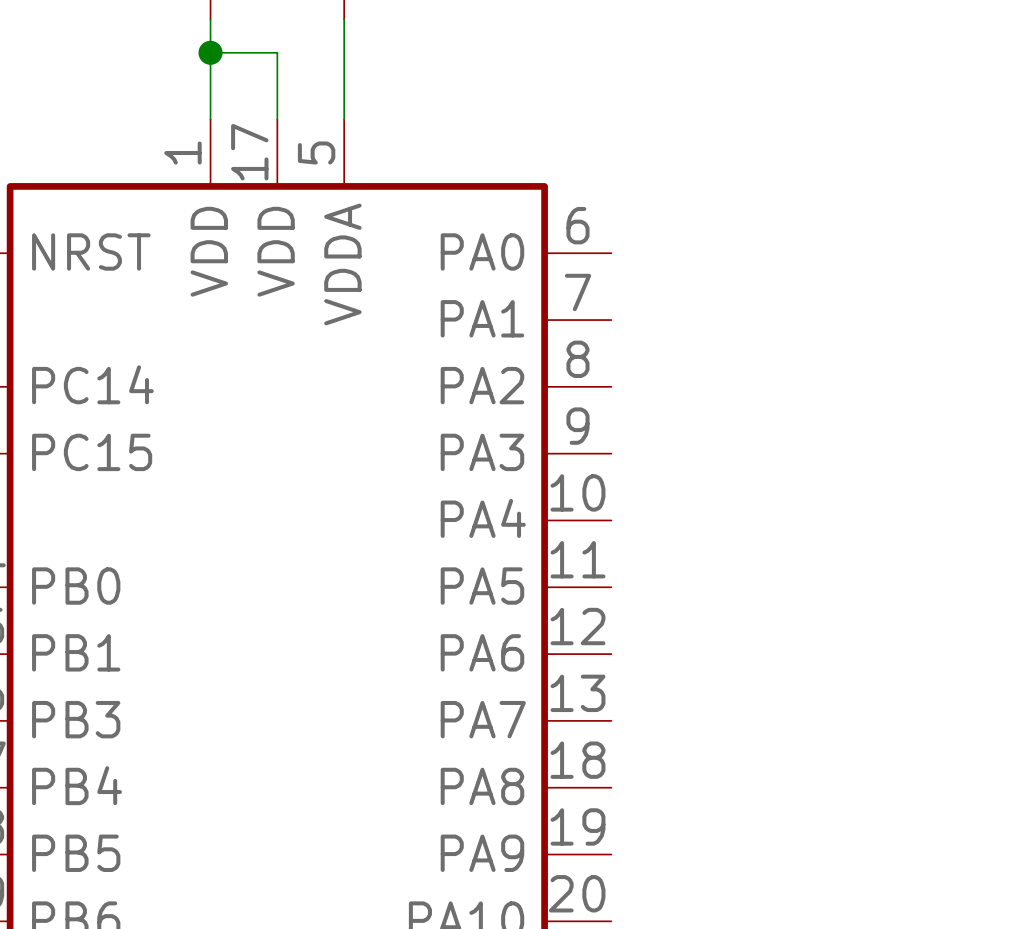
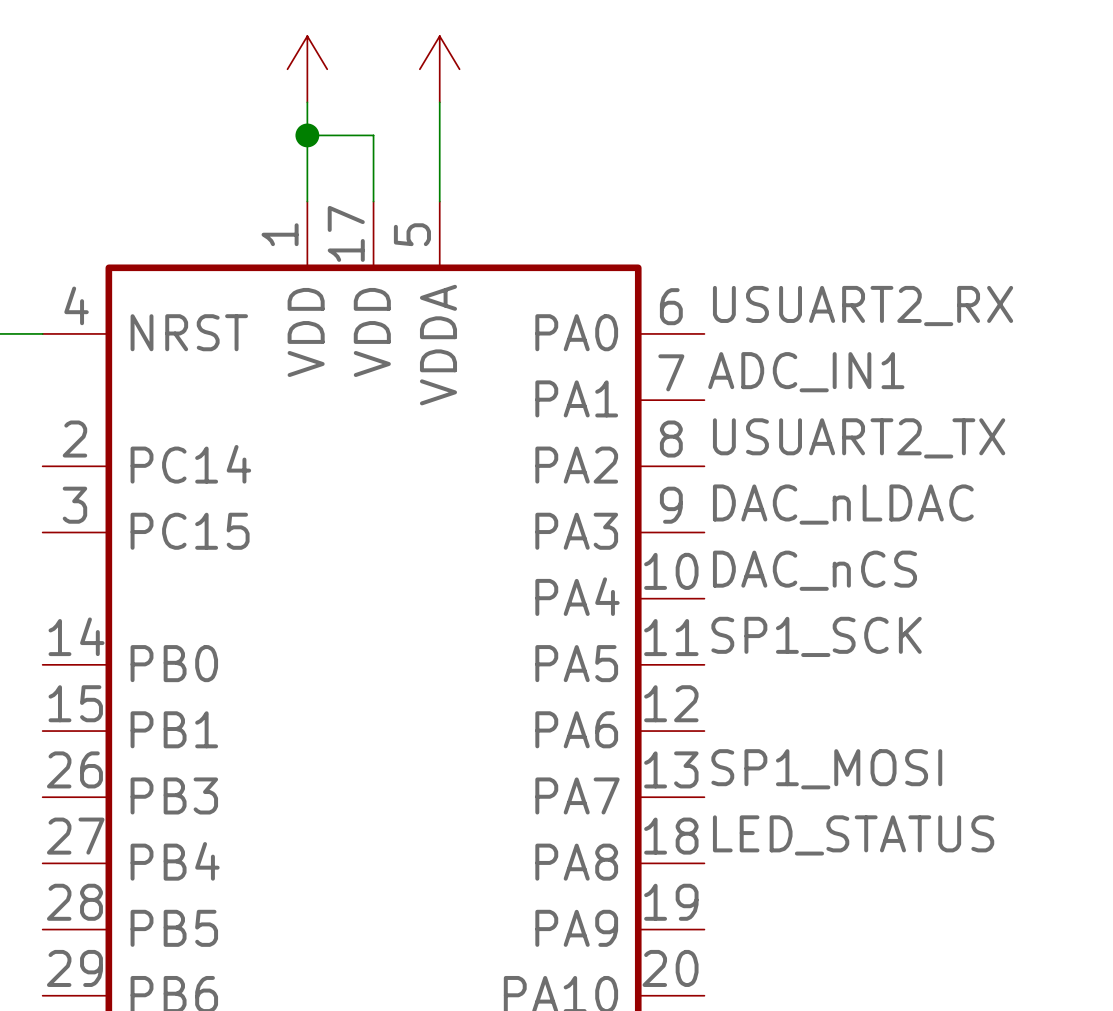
label: none -> USUART2_RX (863, 306)
label: none -> ADC_IN1 (806, 372)
label: none -> USUART2_TX (859, 438)
label: none -> DAC_nLDAC (843, 504)
label: none -> DAC_nCS (814, 570)
label: none -> SP1_SCK (816, 636)
label: none -> SP1_MOSI (826, 769)
label: none -> LED_STATUS (853, 835)

